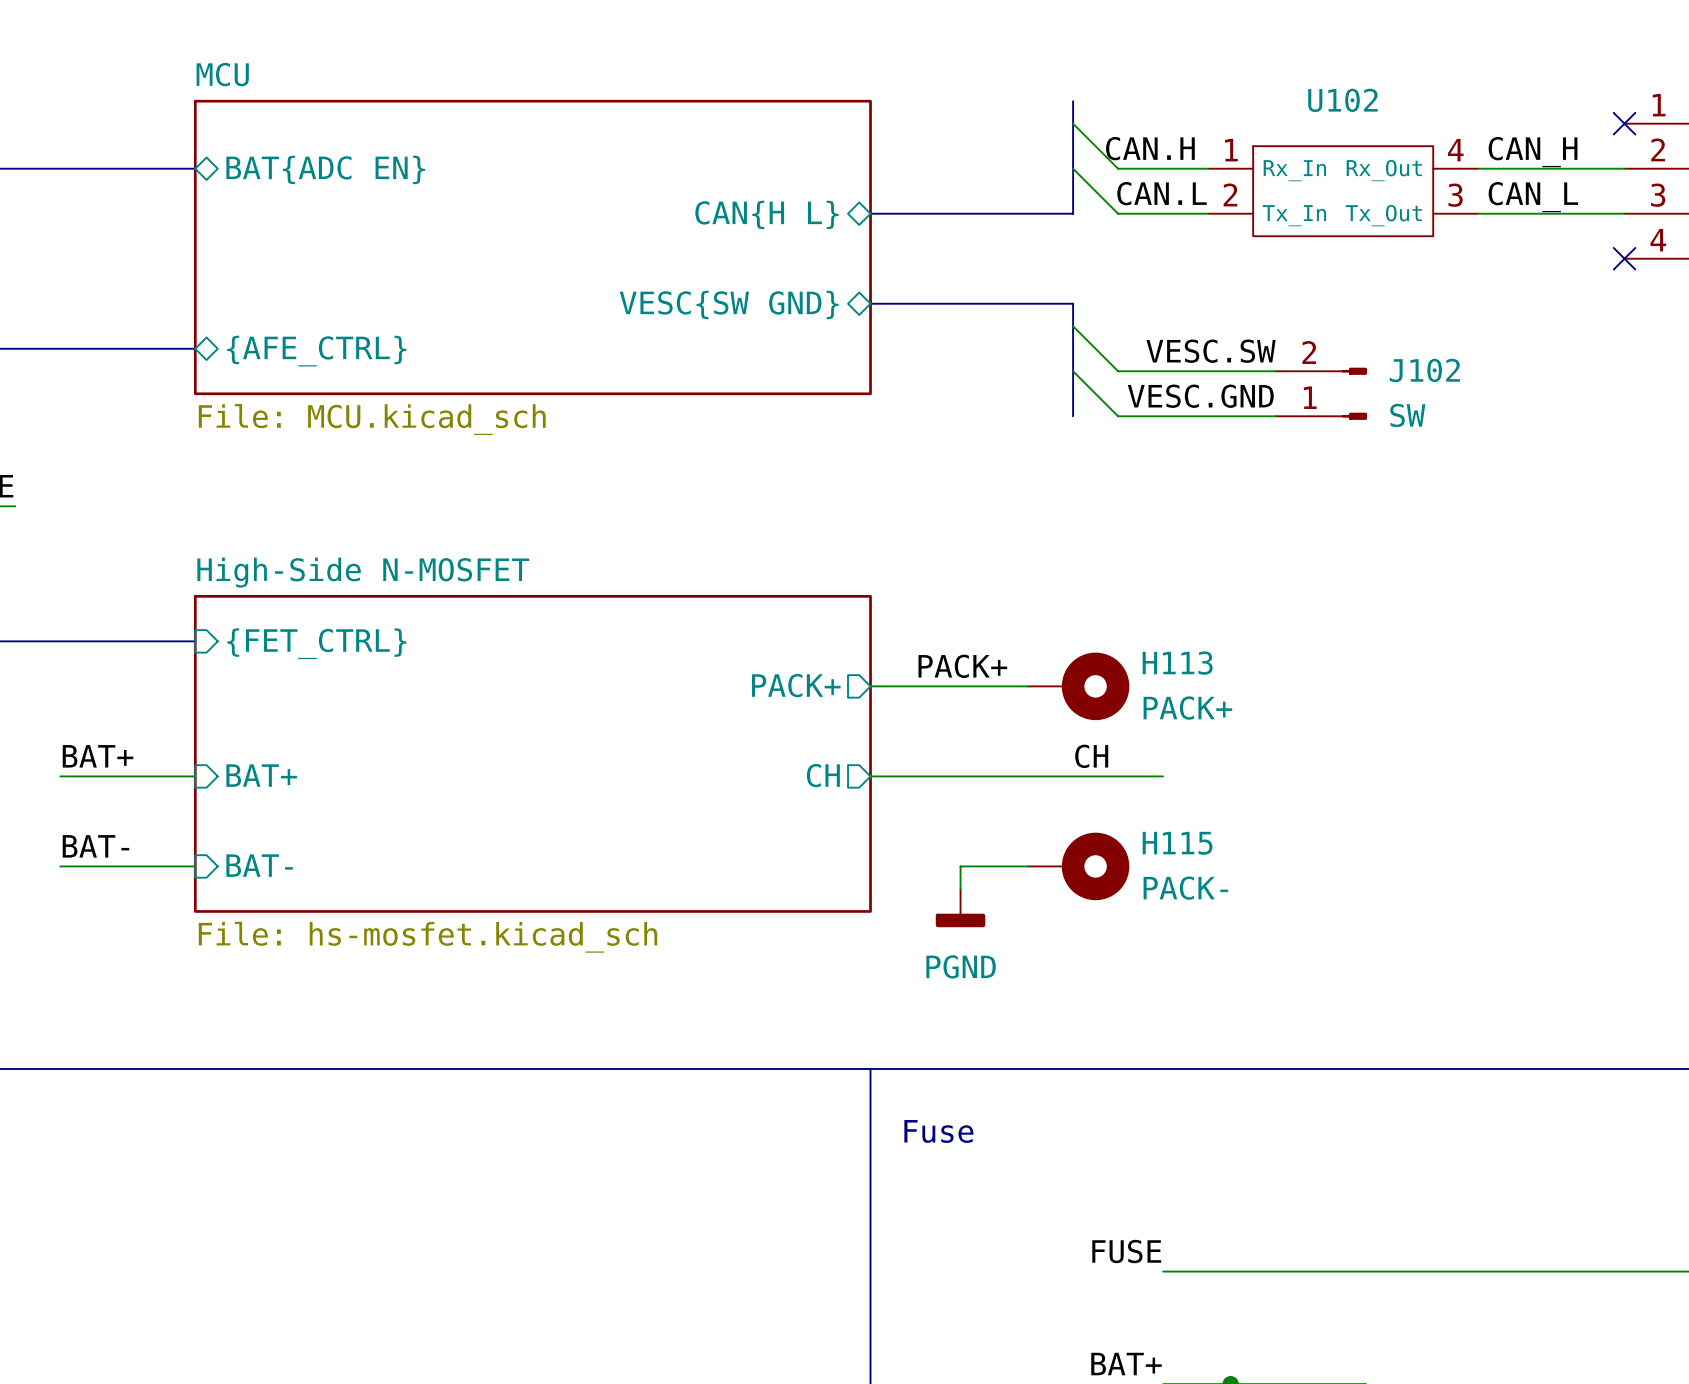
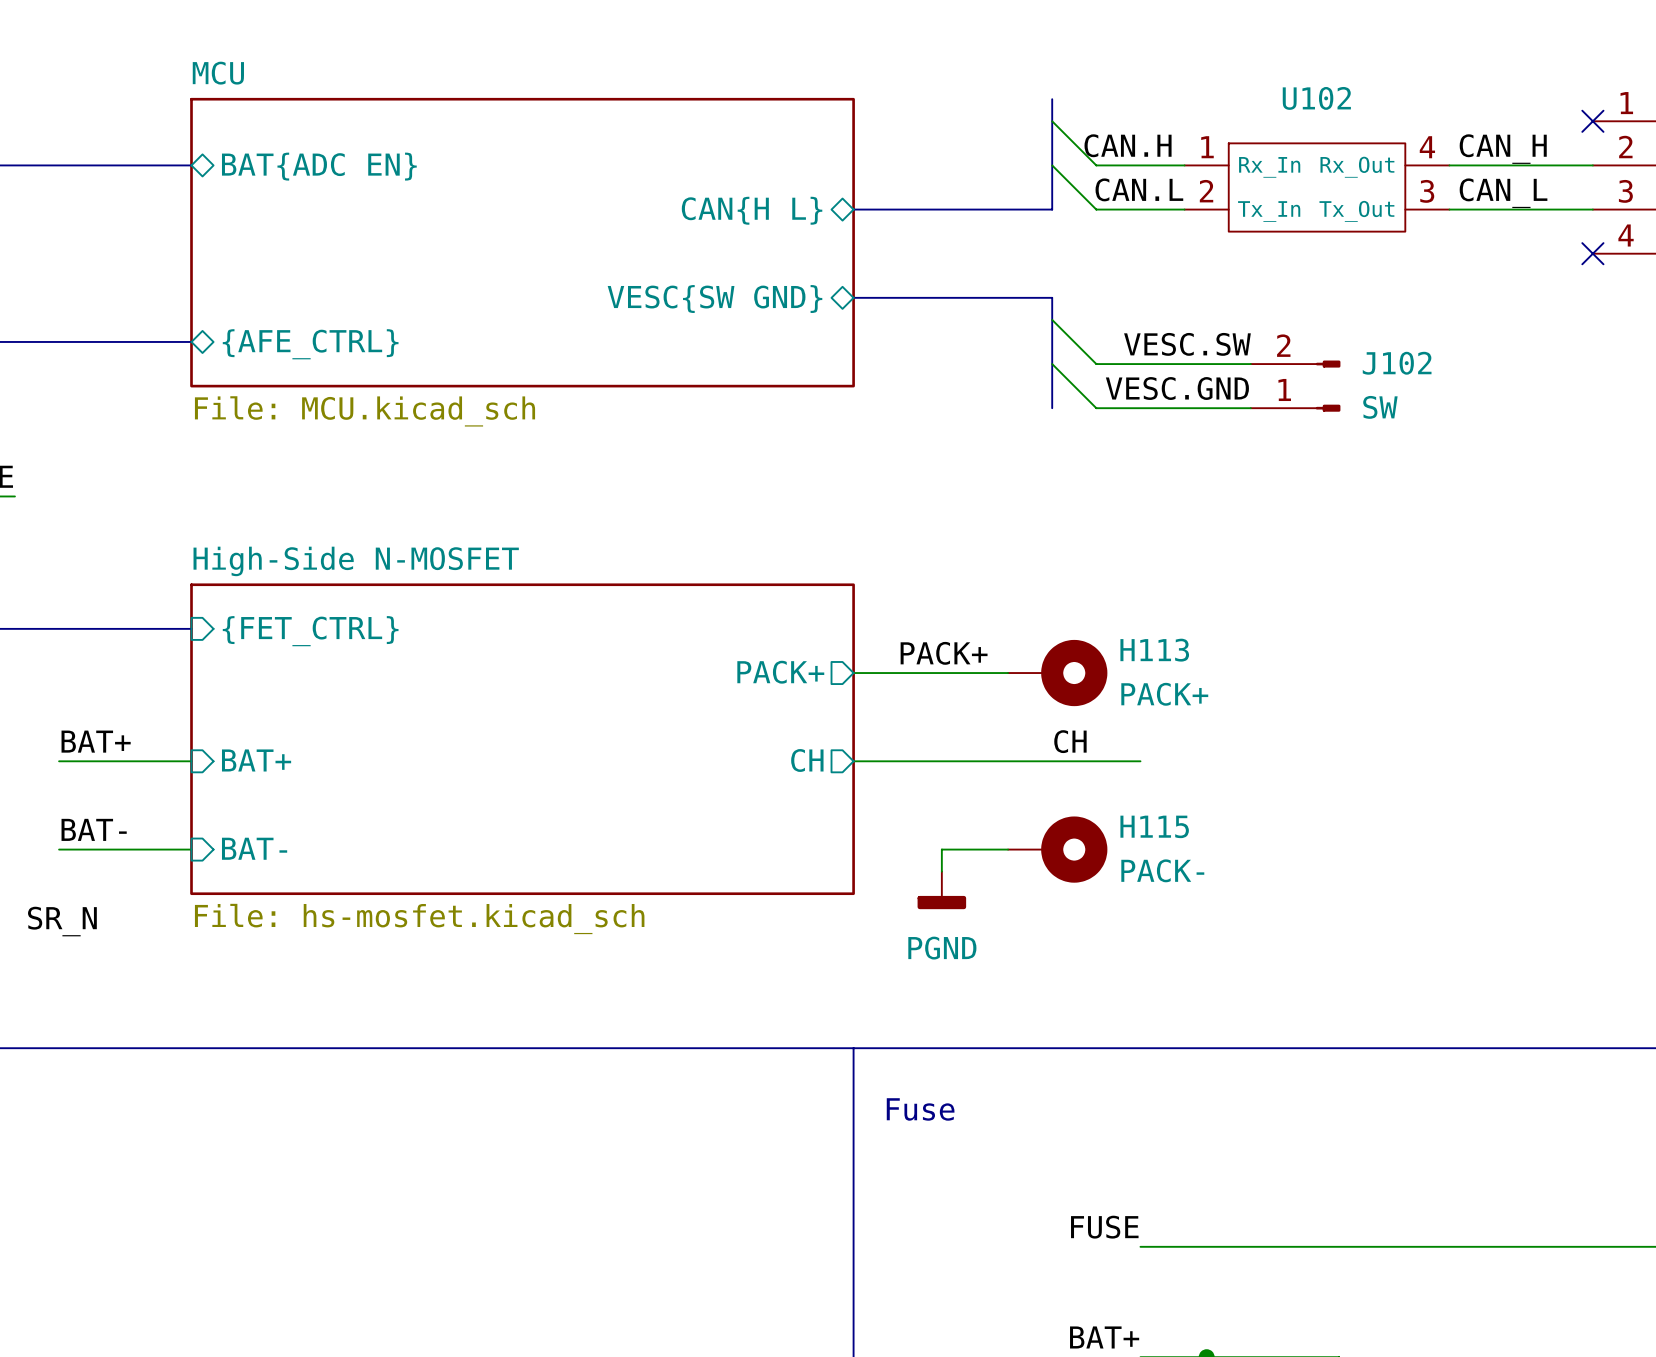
label: none -> SR_N (62, 921)

